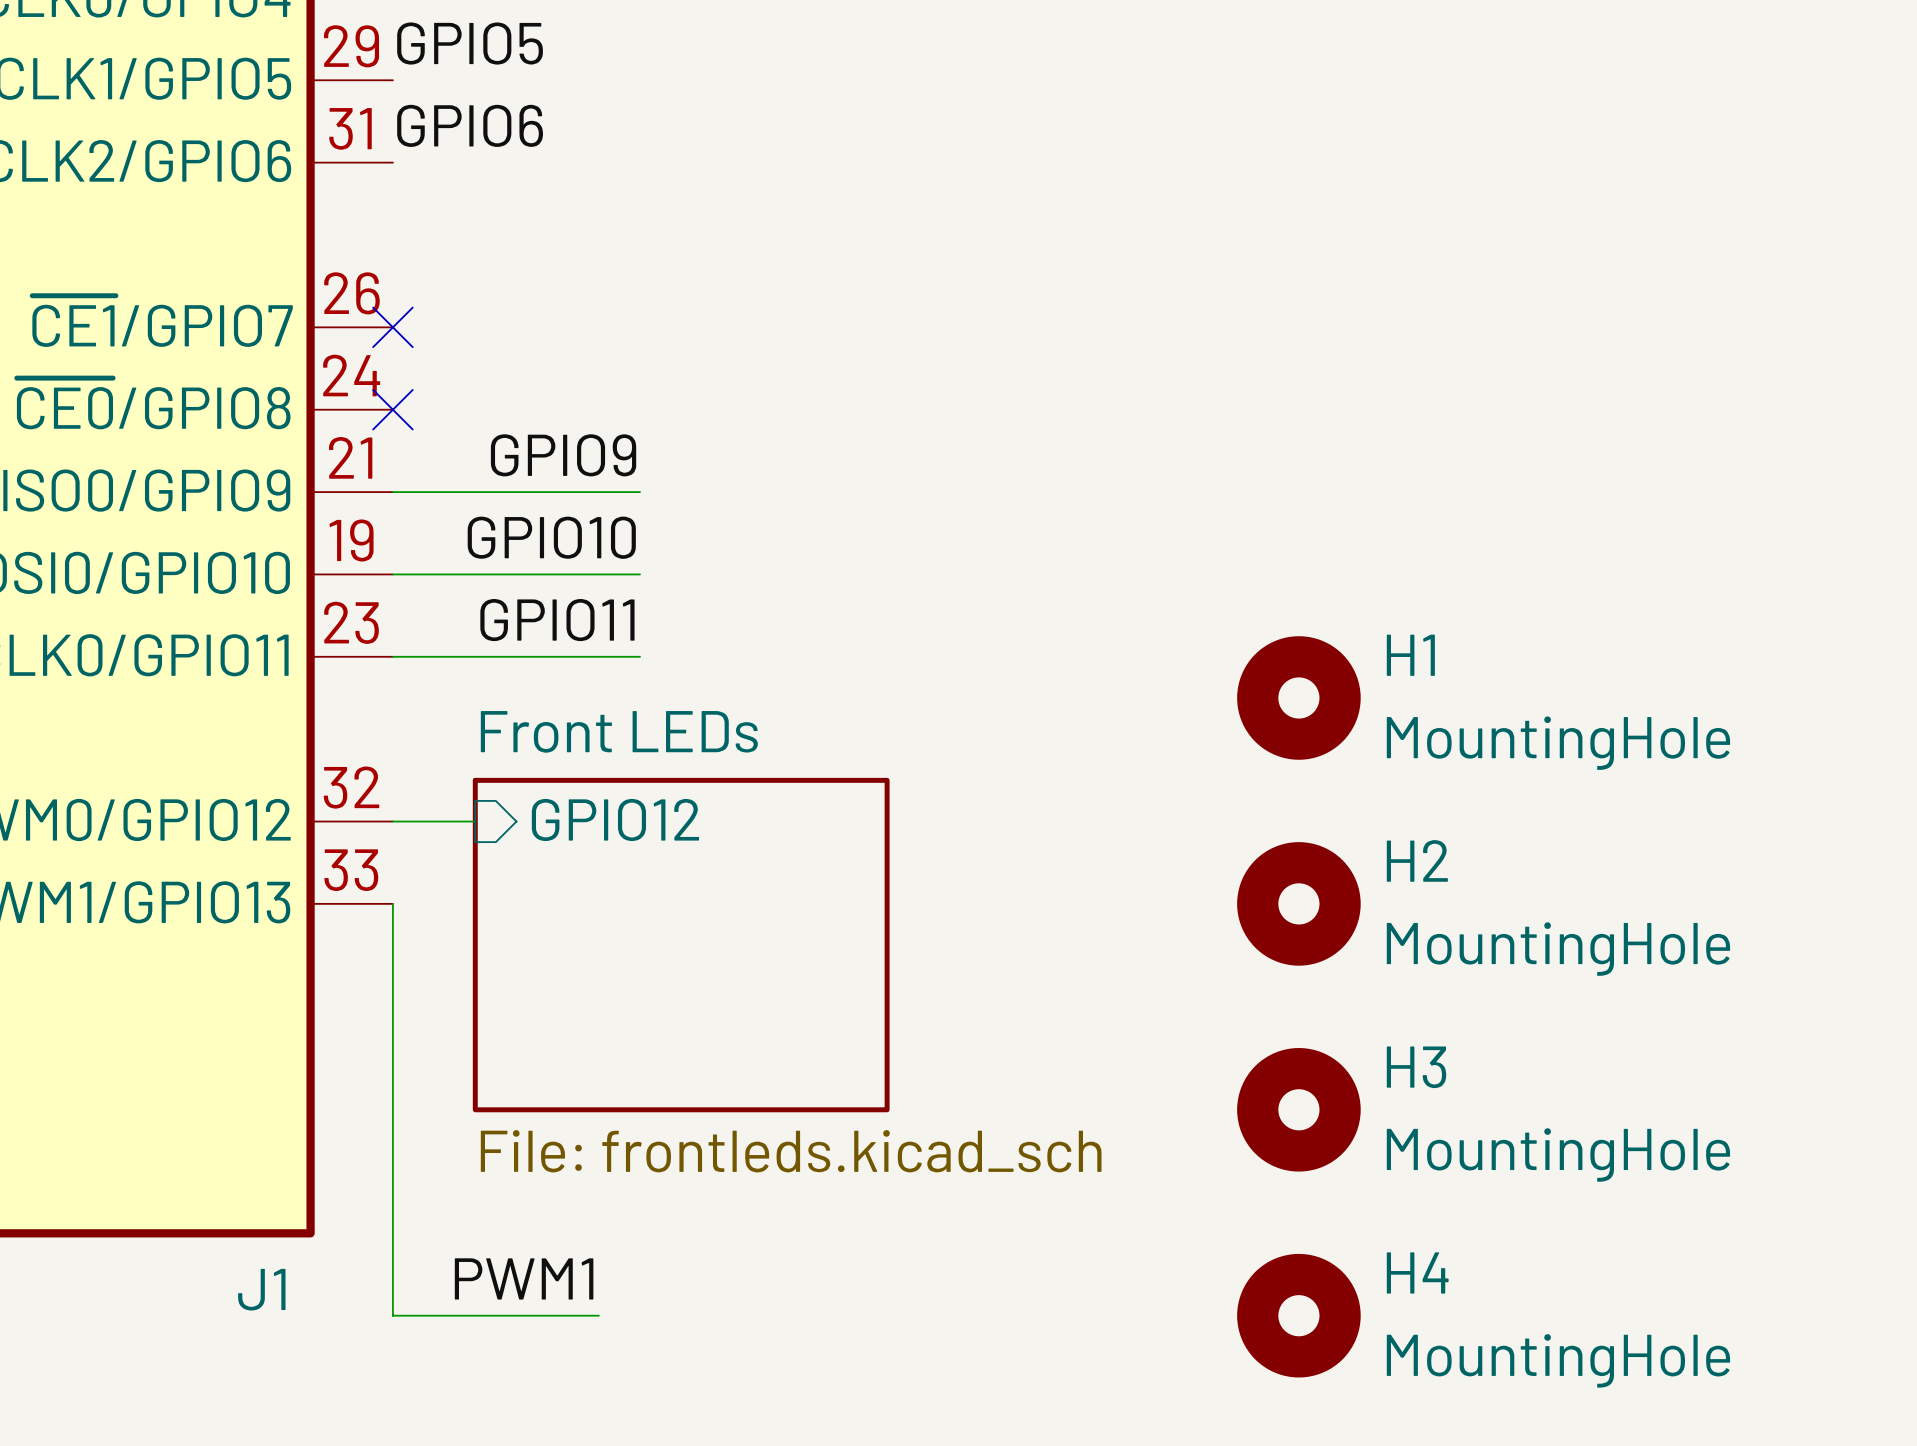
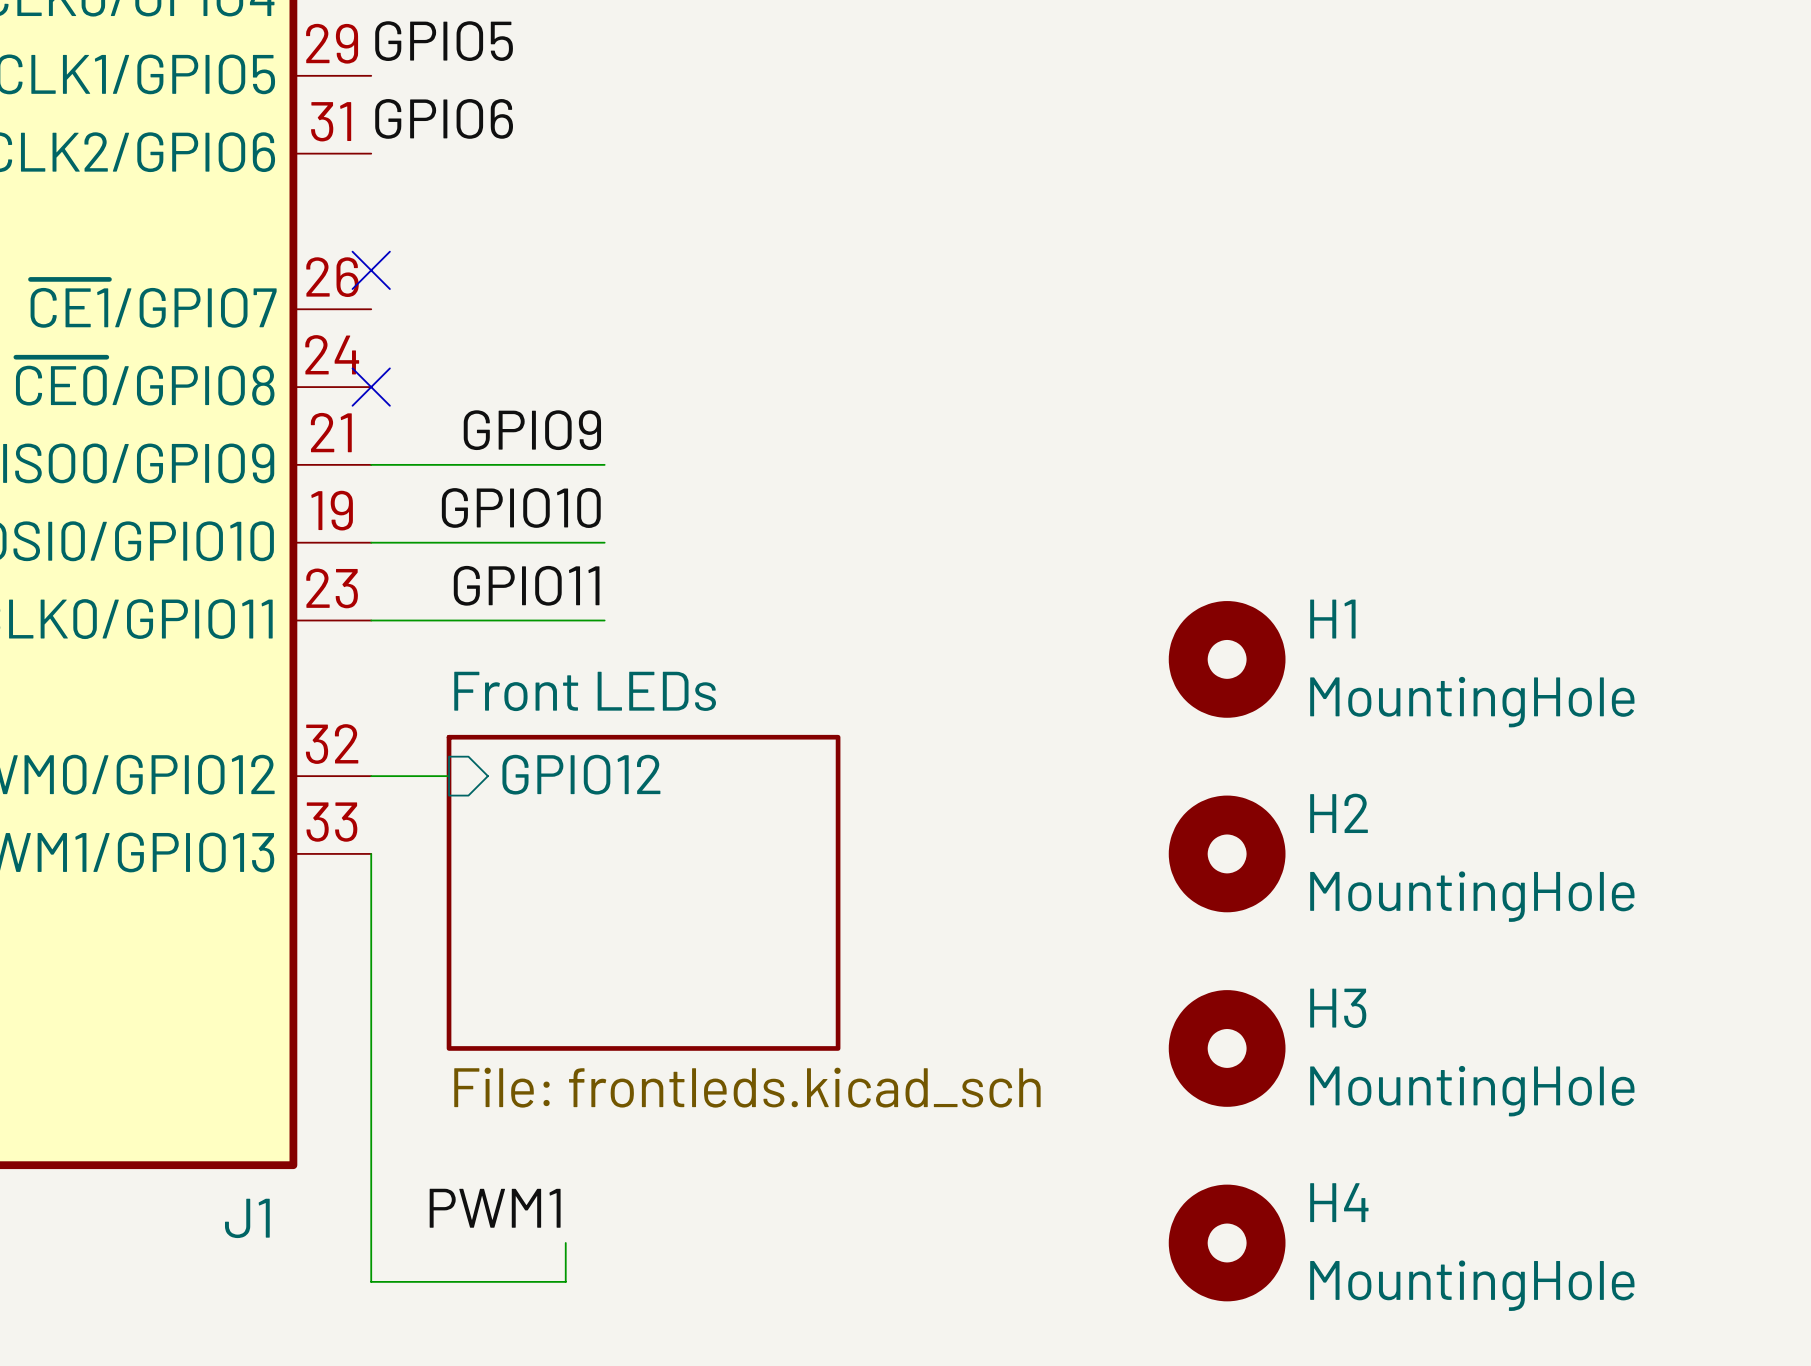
no-connect mark position: (392, 327) -> (371, 270)
wire: (392, 1315) (598, 1315) -> (371, 1242) (371, 1281) (565, 1281) (565, 1242)

